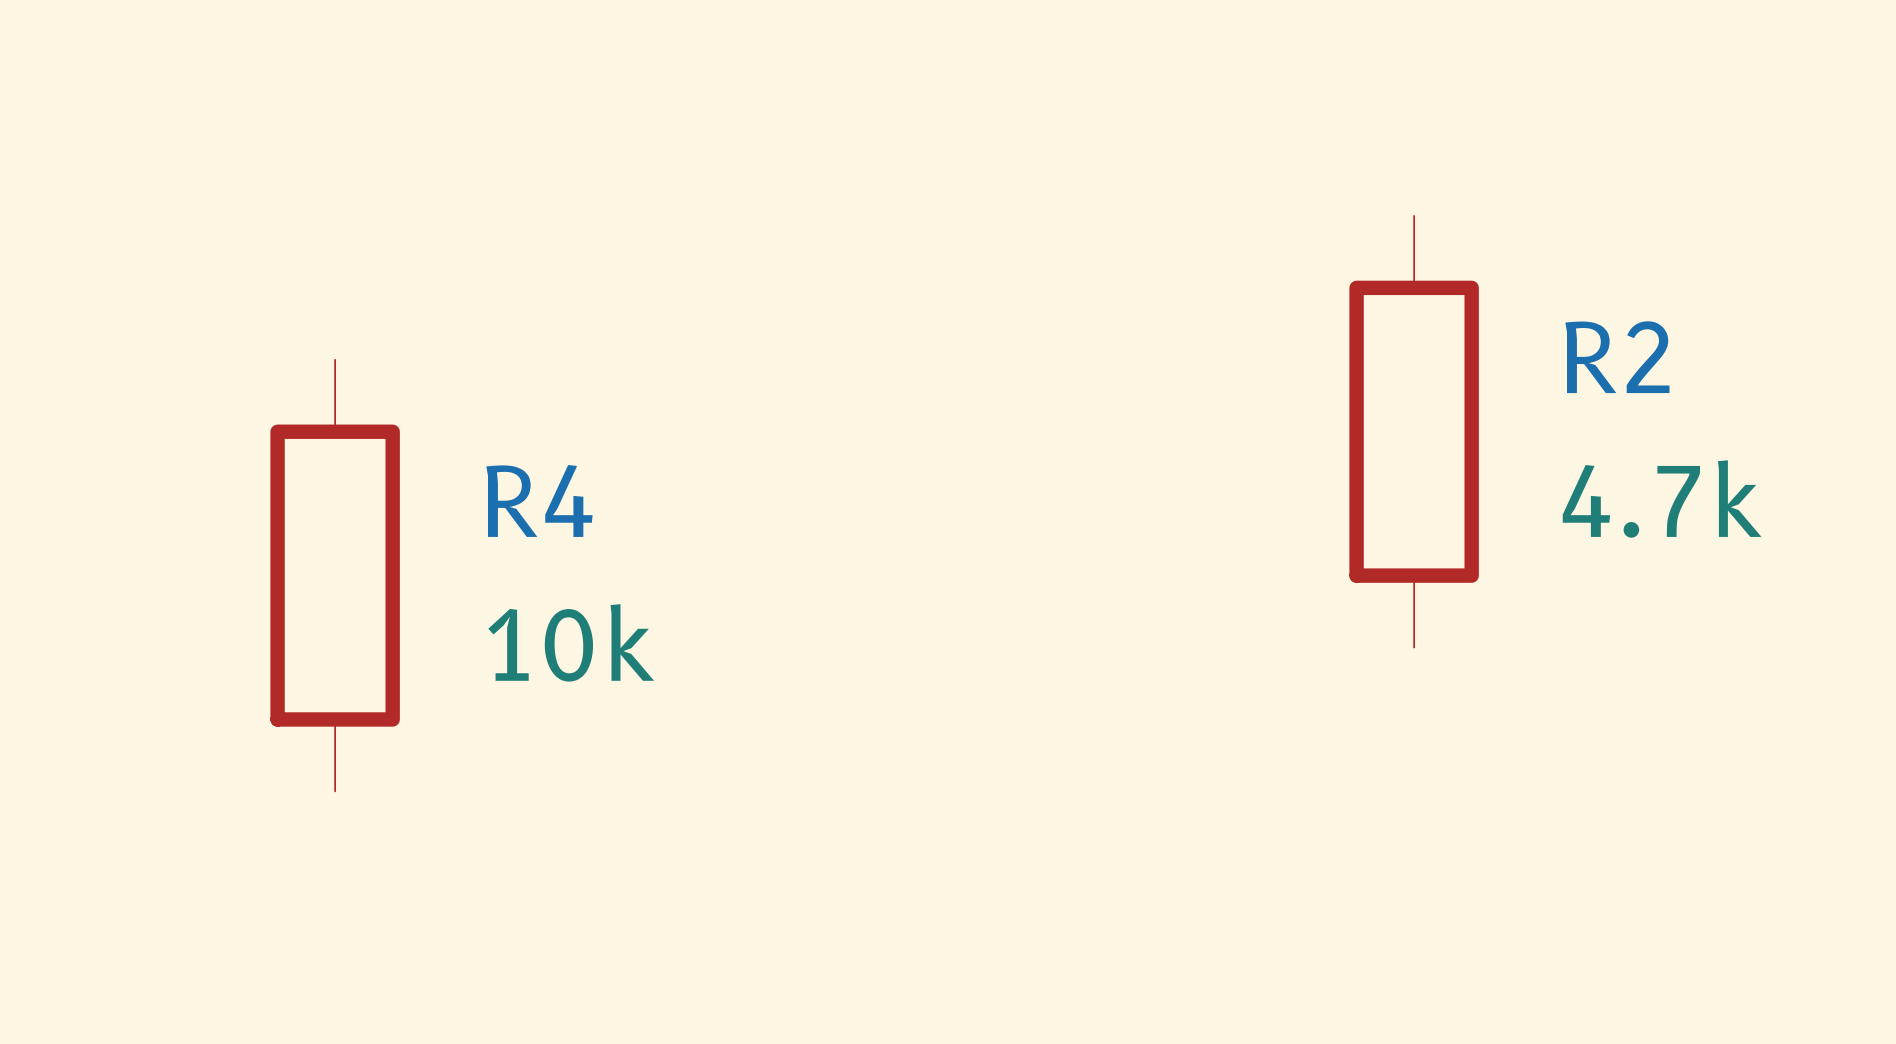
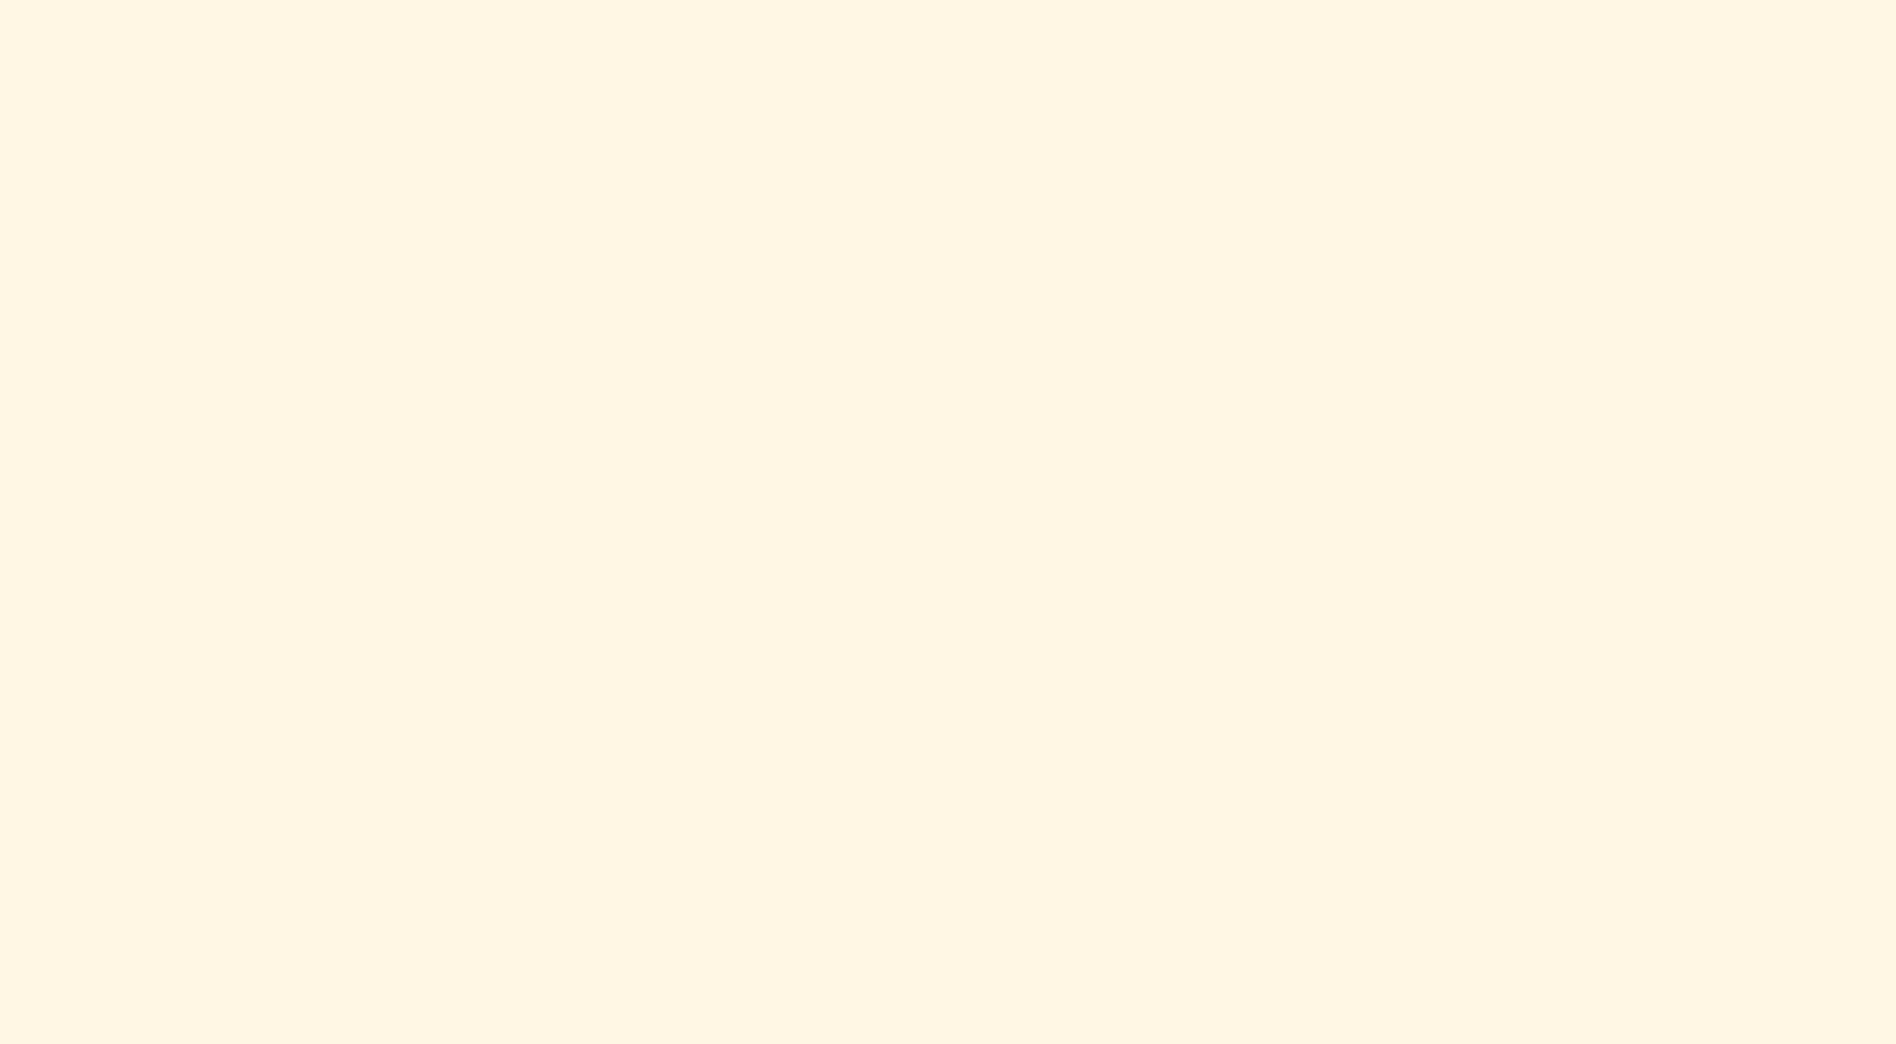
R2: 4.7k (1414, 431) -> none
R4: 10k (335, 575) -> none

